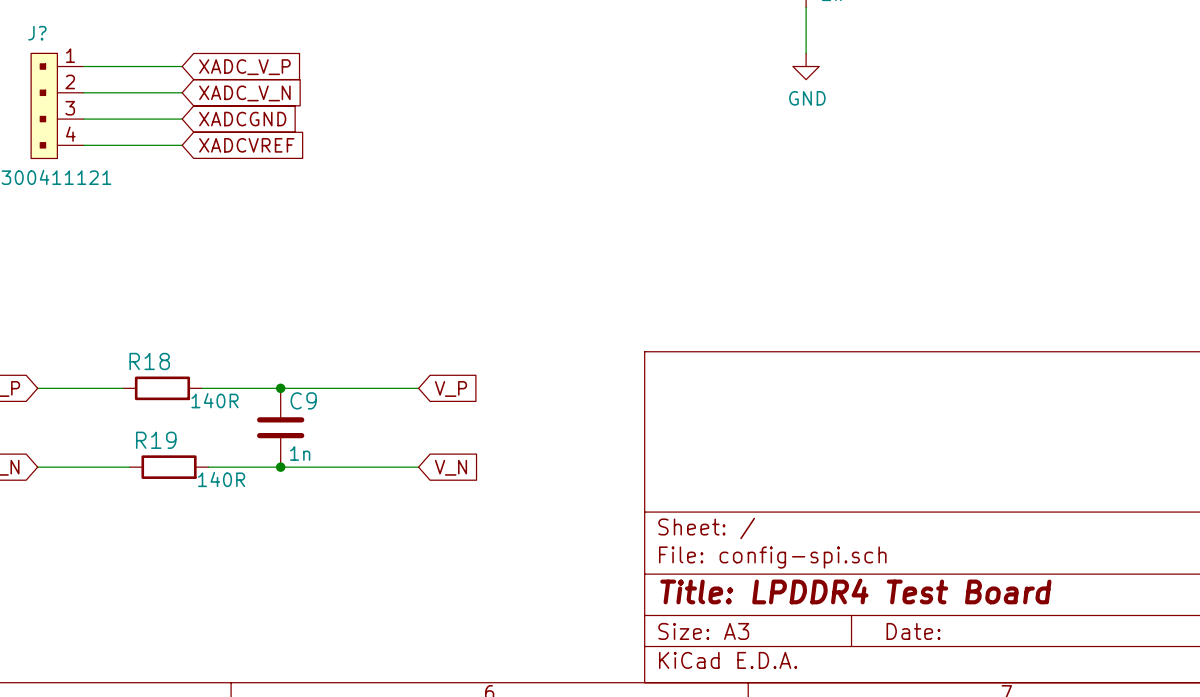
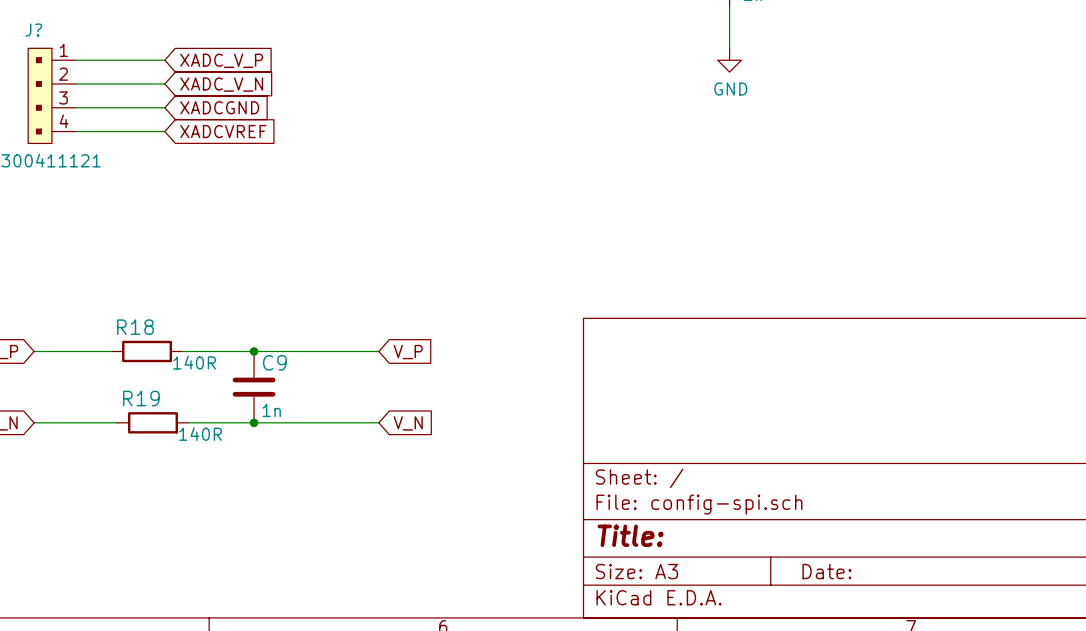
title block: Title: LPDDR4 Test Board (855, 591) -> Title: (630, 535)

